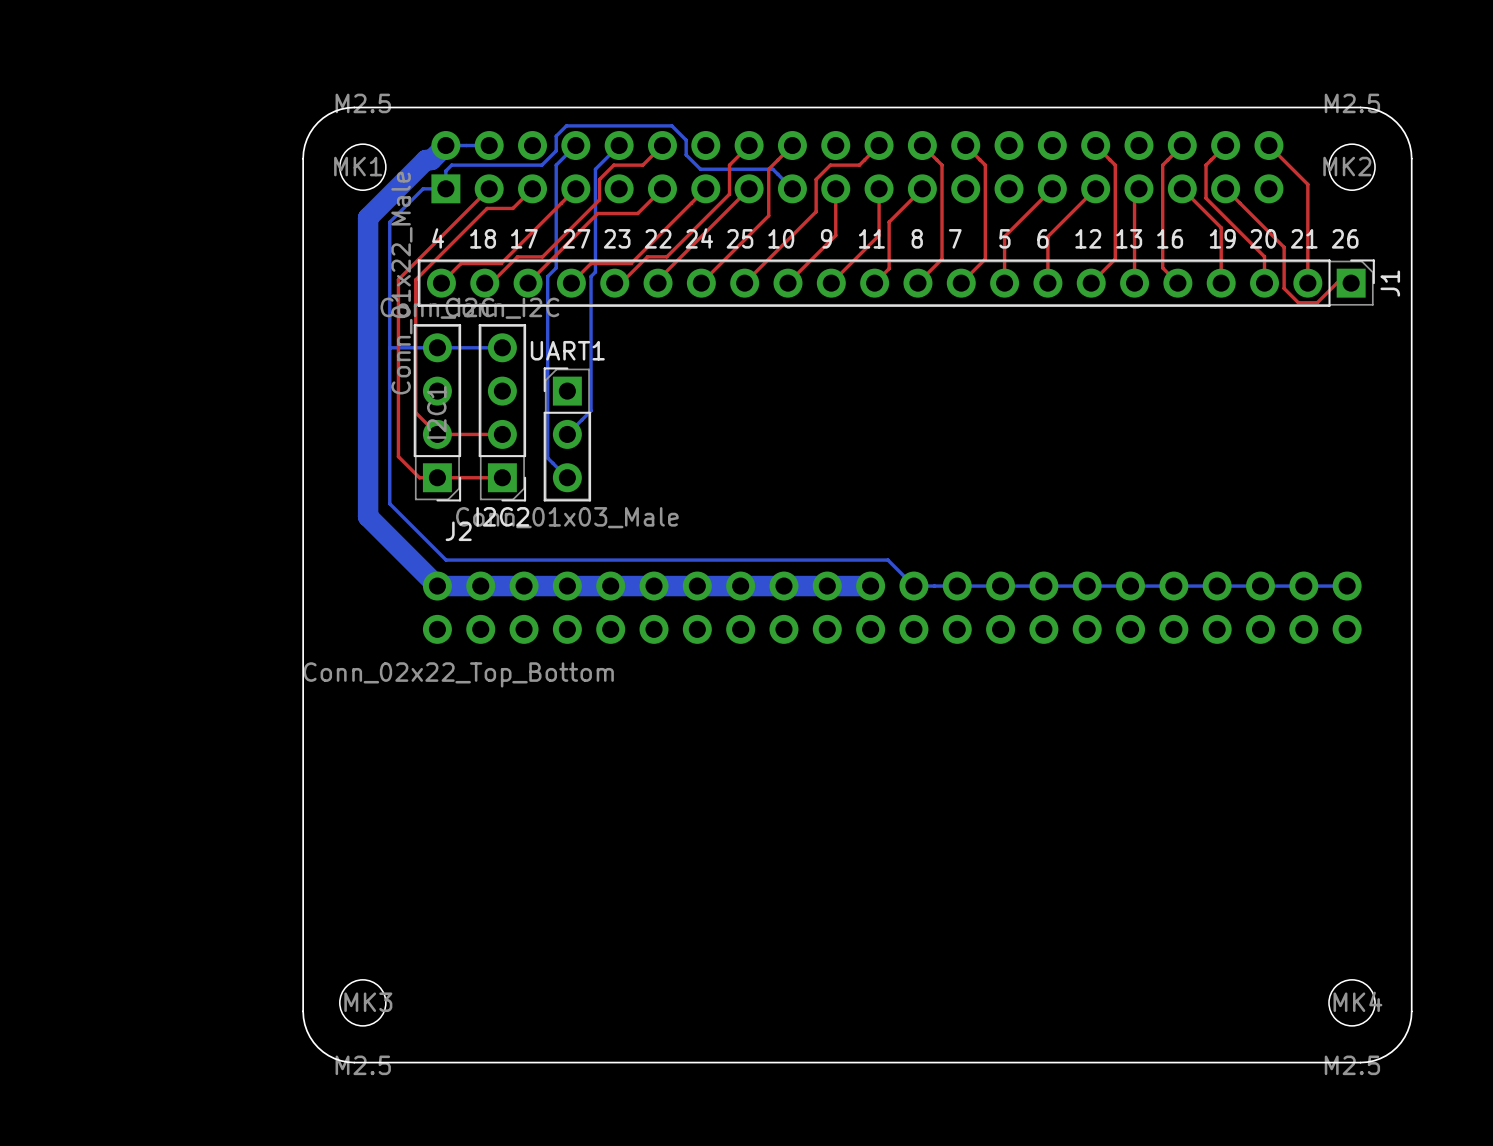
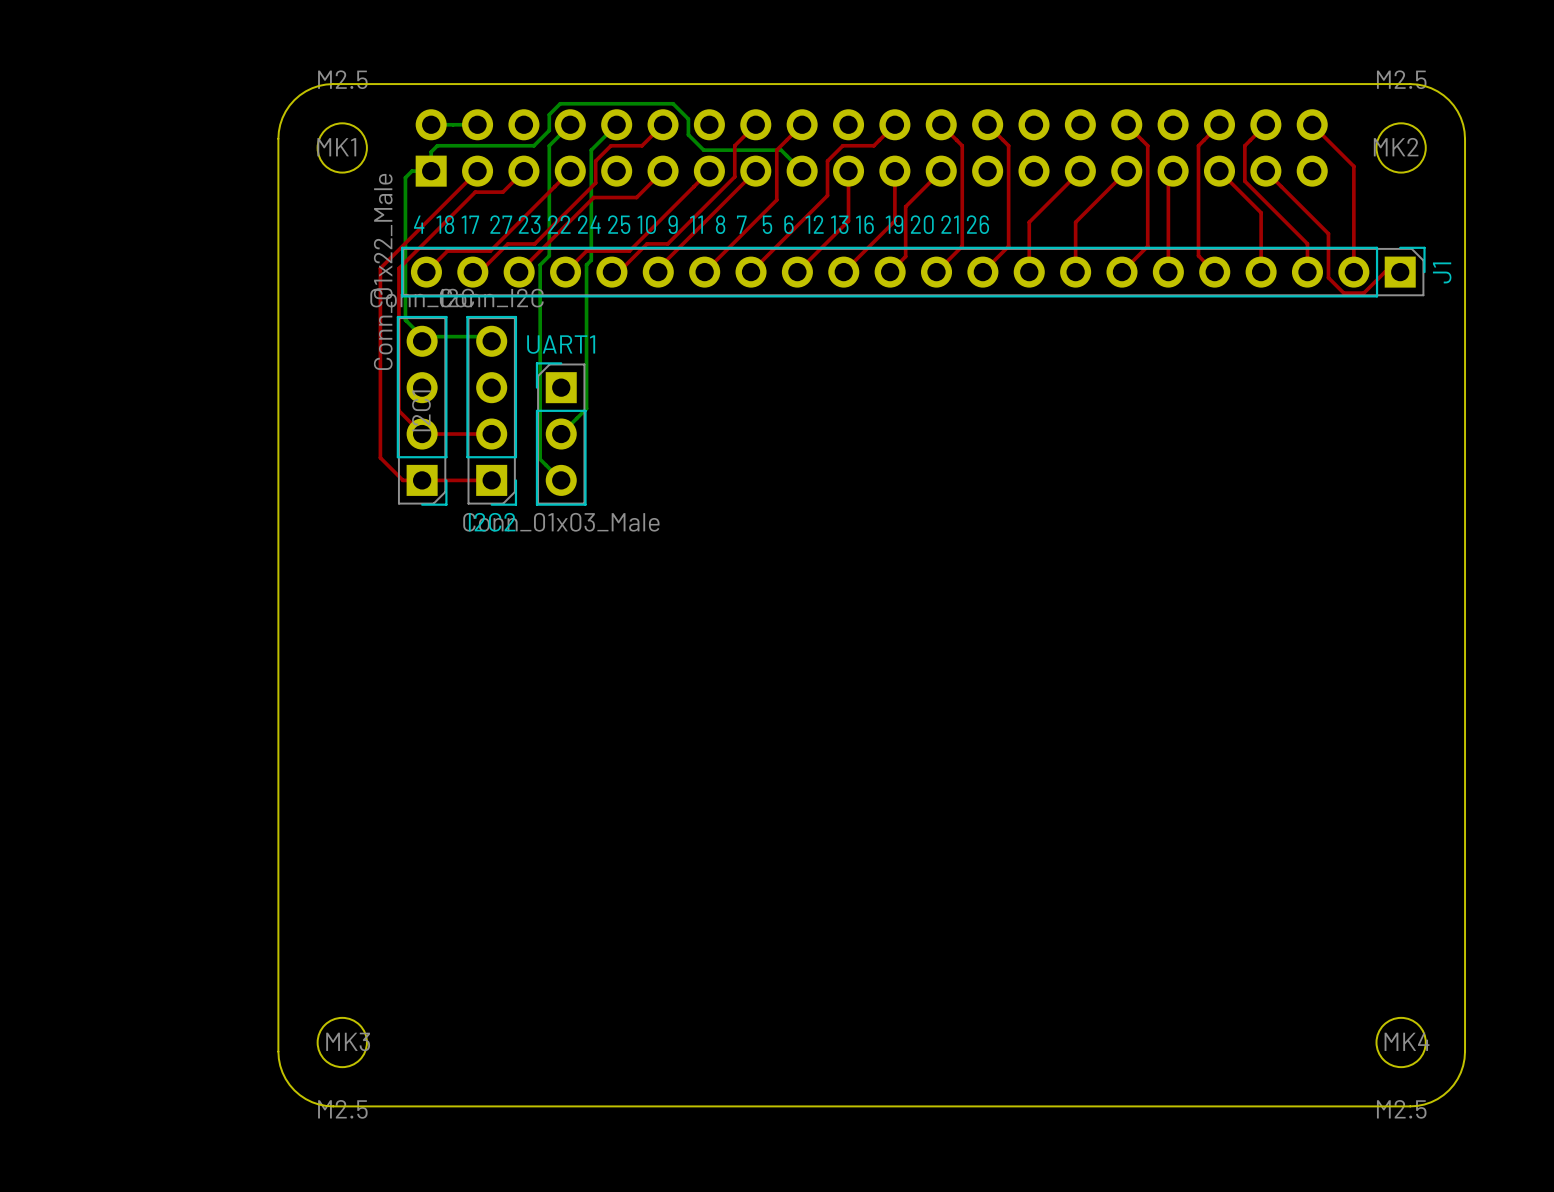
bottom track: (445, 145) (431, 160) (425, 160) (368, 217) (368, 516) (437, 586) (870, 586) -> none
bottom track: (427, 188) (423, 188) (389, 222) (389, 503) (446, 560) (887, 560) (913, 586) (1347, 586) -> (412, 171) (405, 177) (405, 319) (422, 336) (477, 336)
bottom track: (389, 347) (502, 347) -> none
J2: Conn_02x22_Top_Bottom (892, 607) -> none

